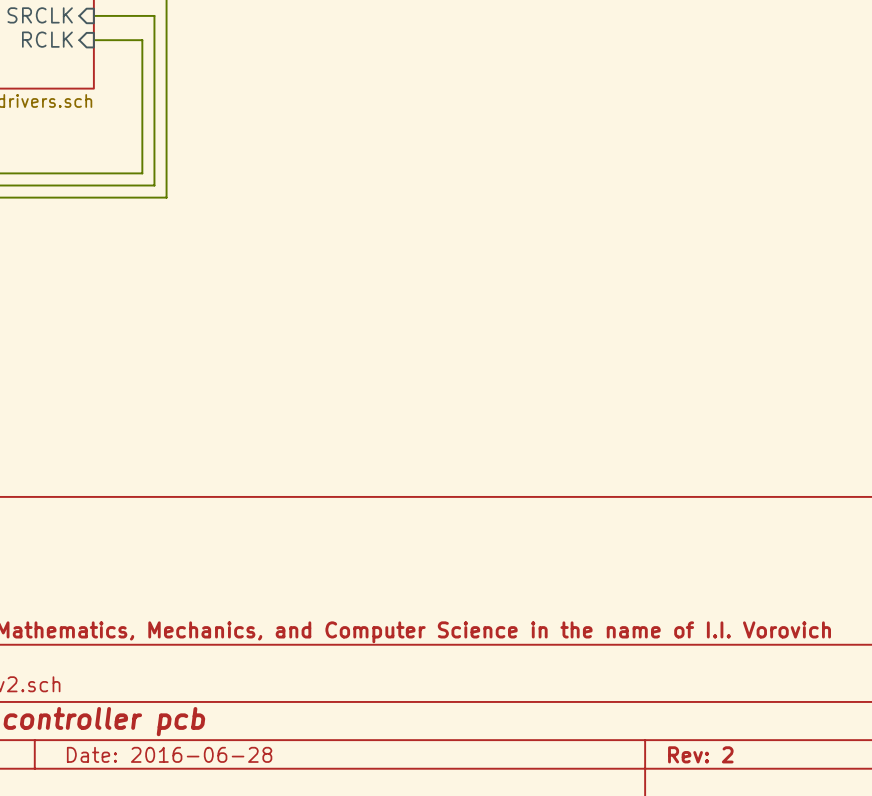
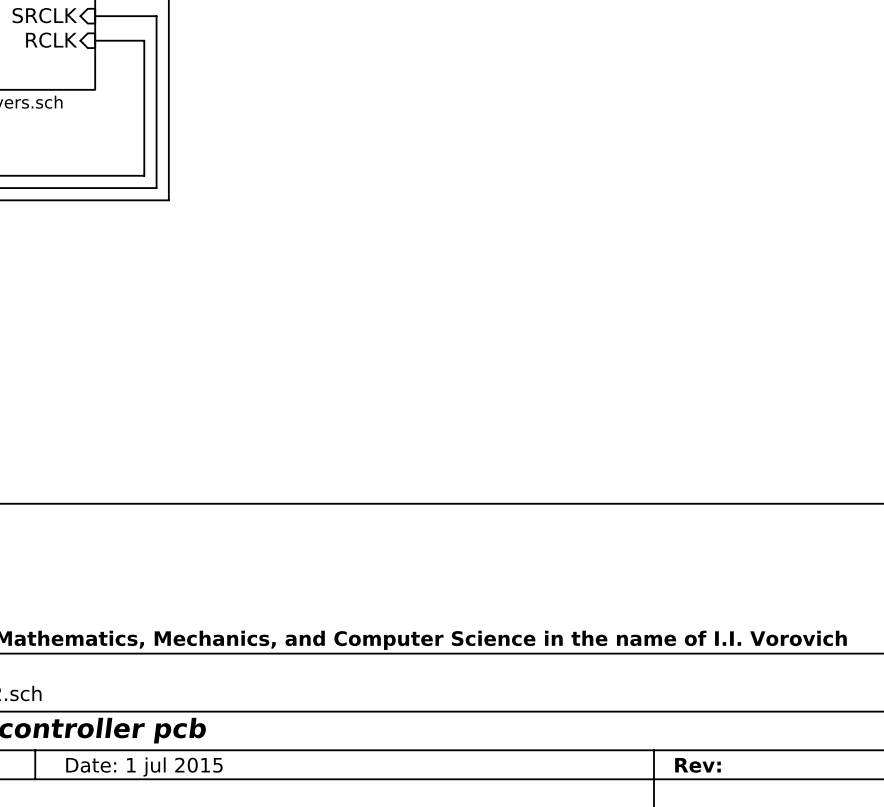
title block: Date: 2016-06-28 (169, 754) -> Date: 1 jul 2015 (144, 766)
title block: Rev: 2 (700, 754) -> Rev: (697, 765)

